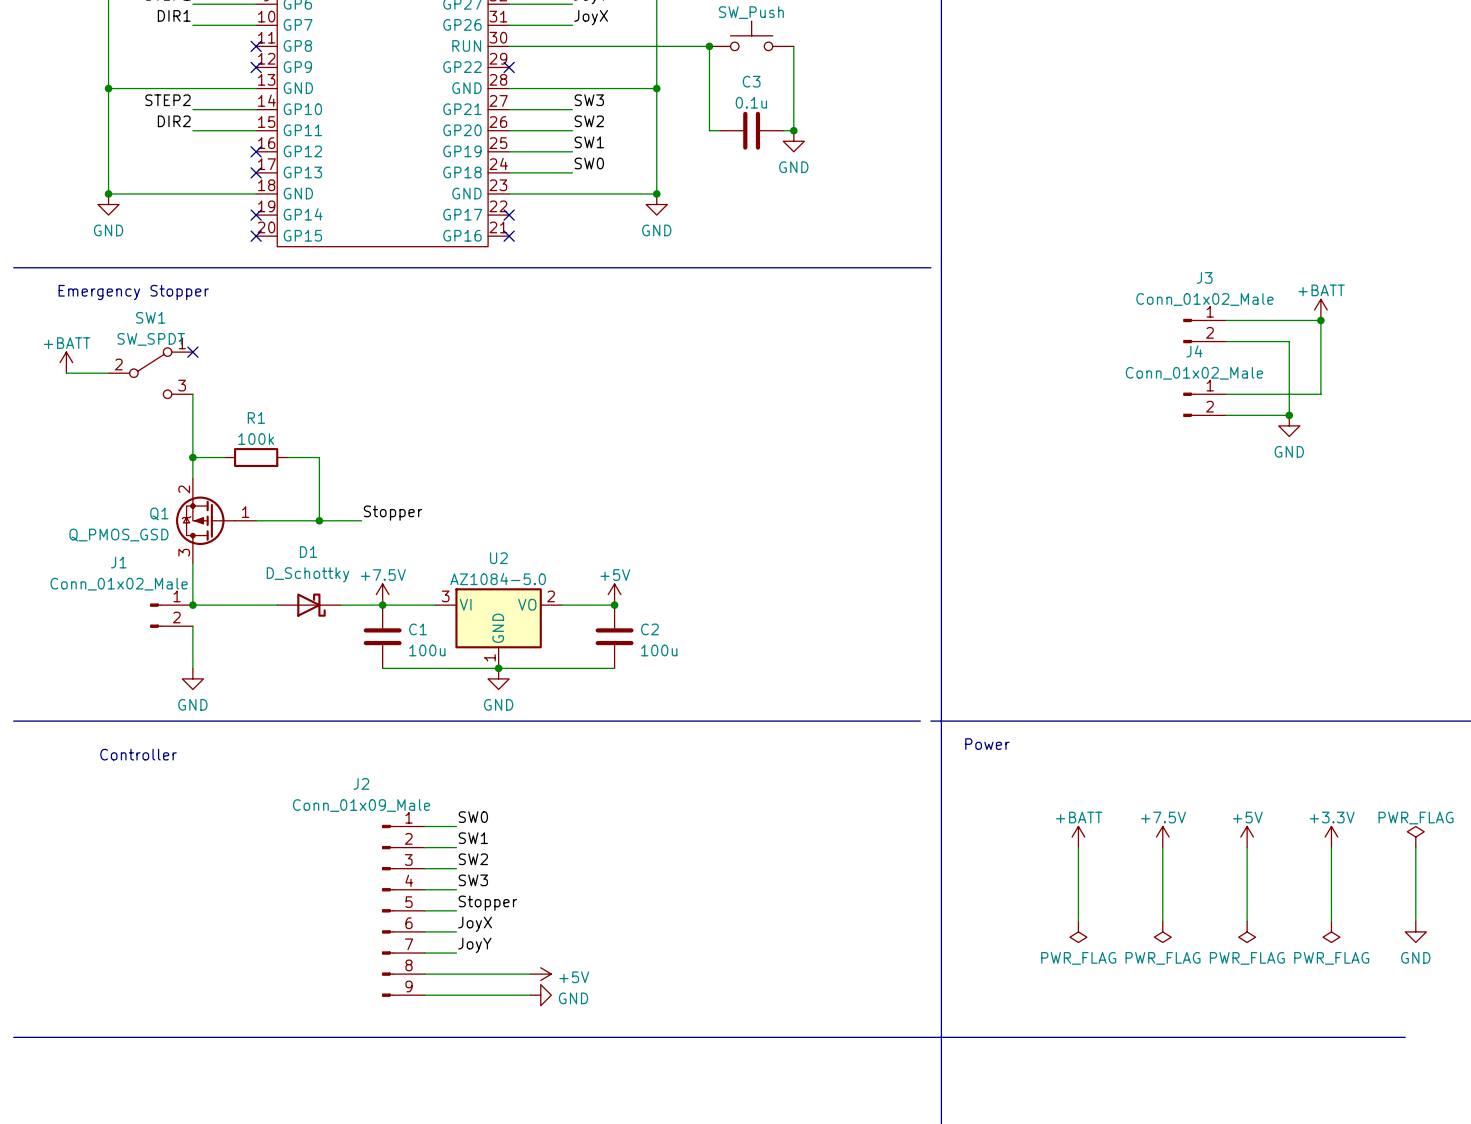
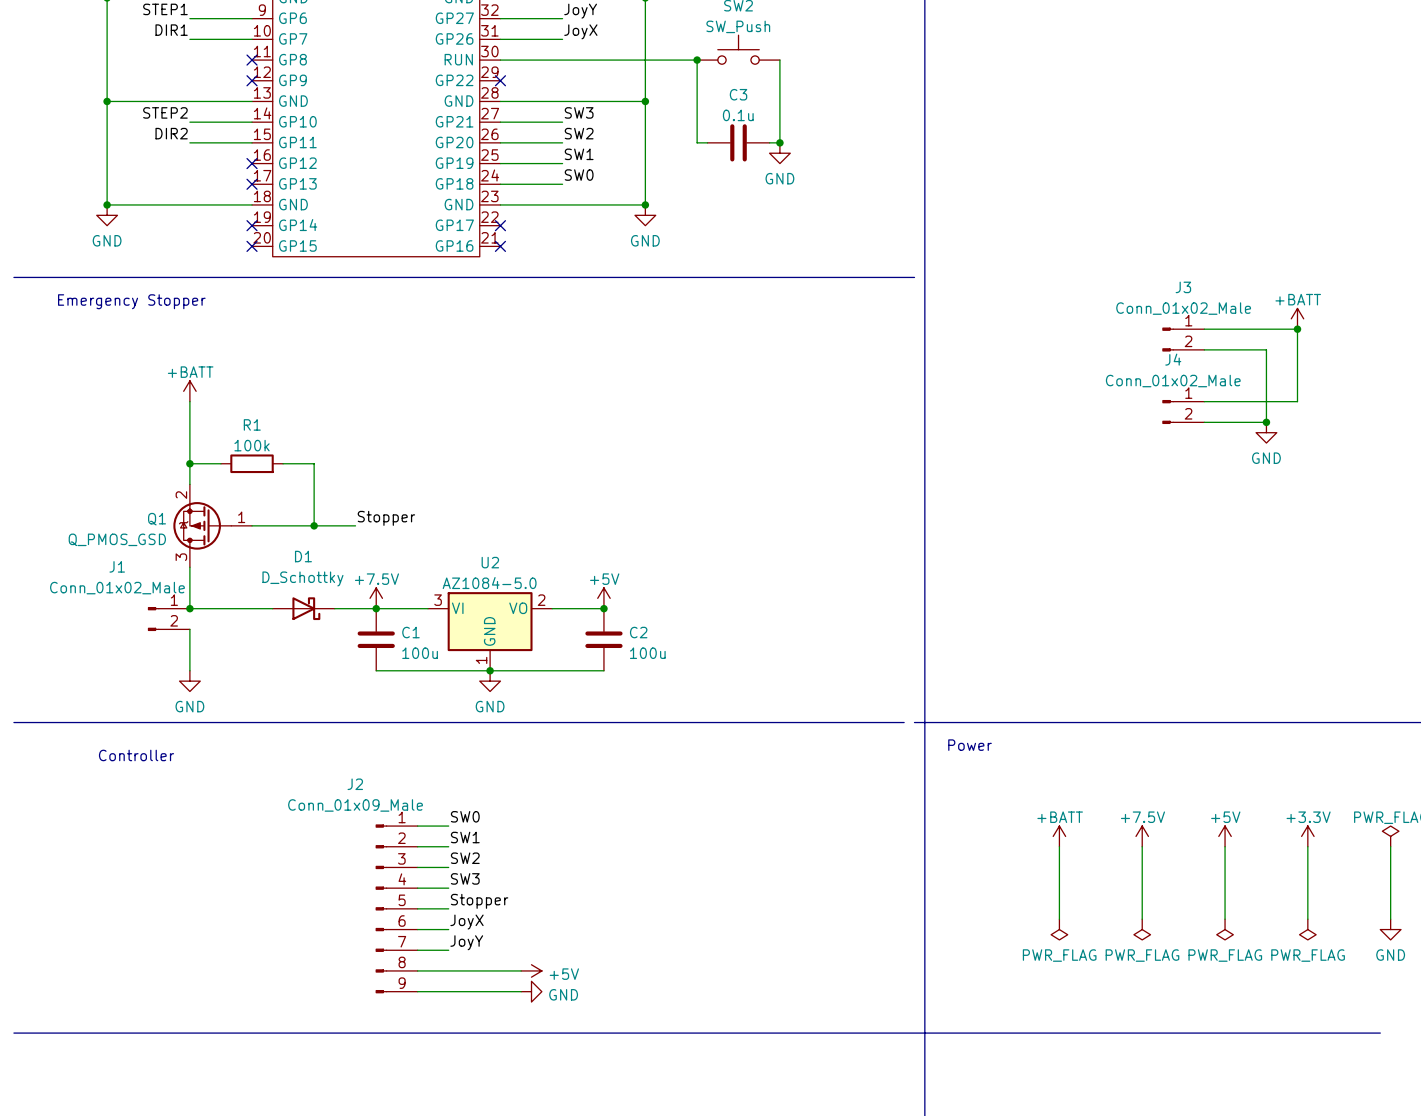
no-connect mark: (192, 352) -> none
power symbol position: +BATT (66, 362) -> +BATT (189, 391)
wire: (66, 373) (108, 373) -> none
SW1: SW_SPDT (150, 373) -> none

